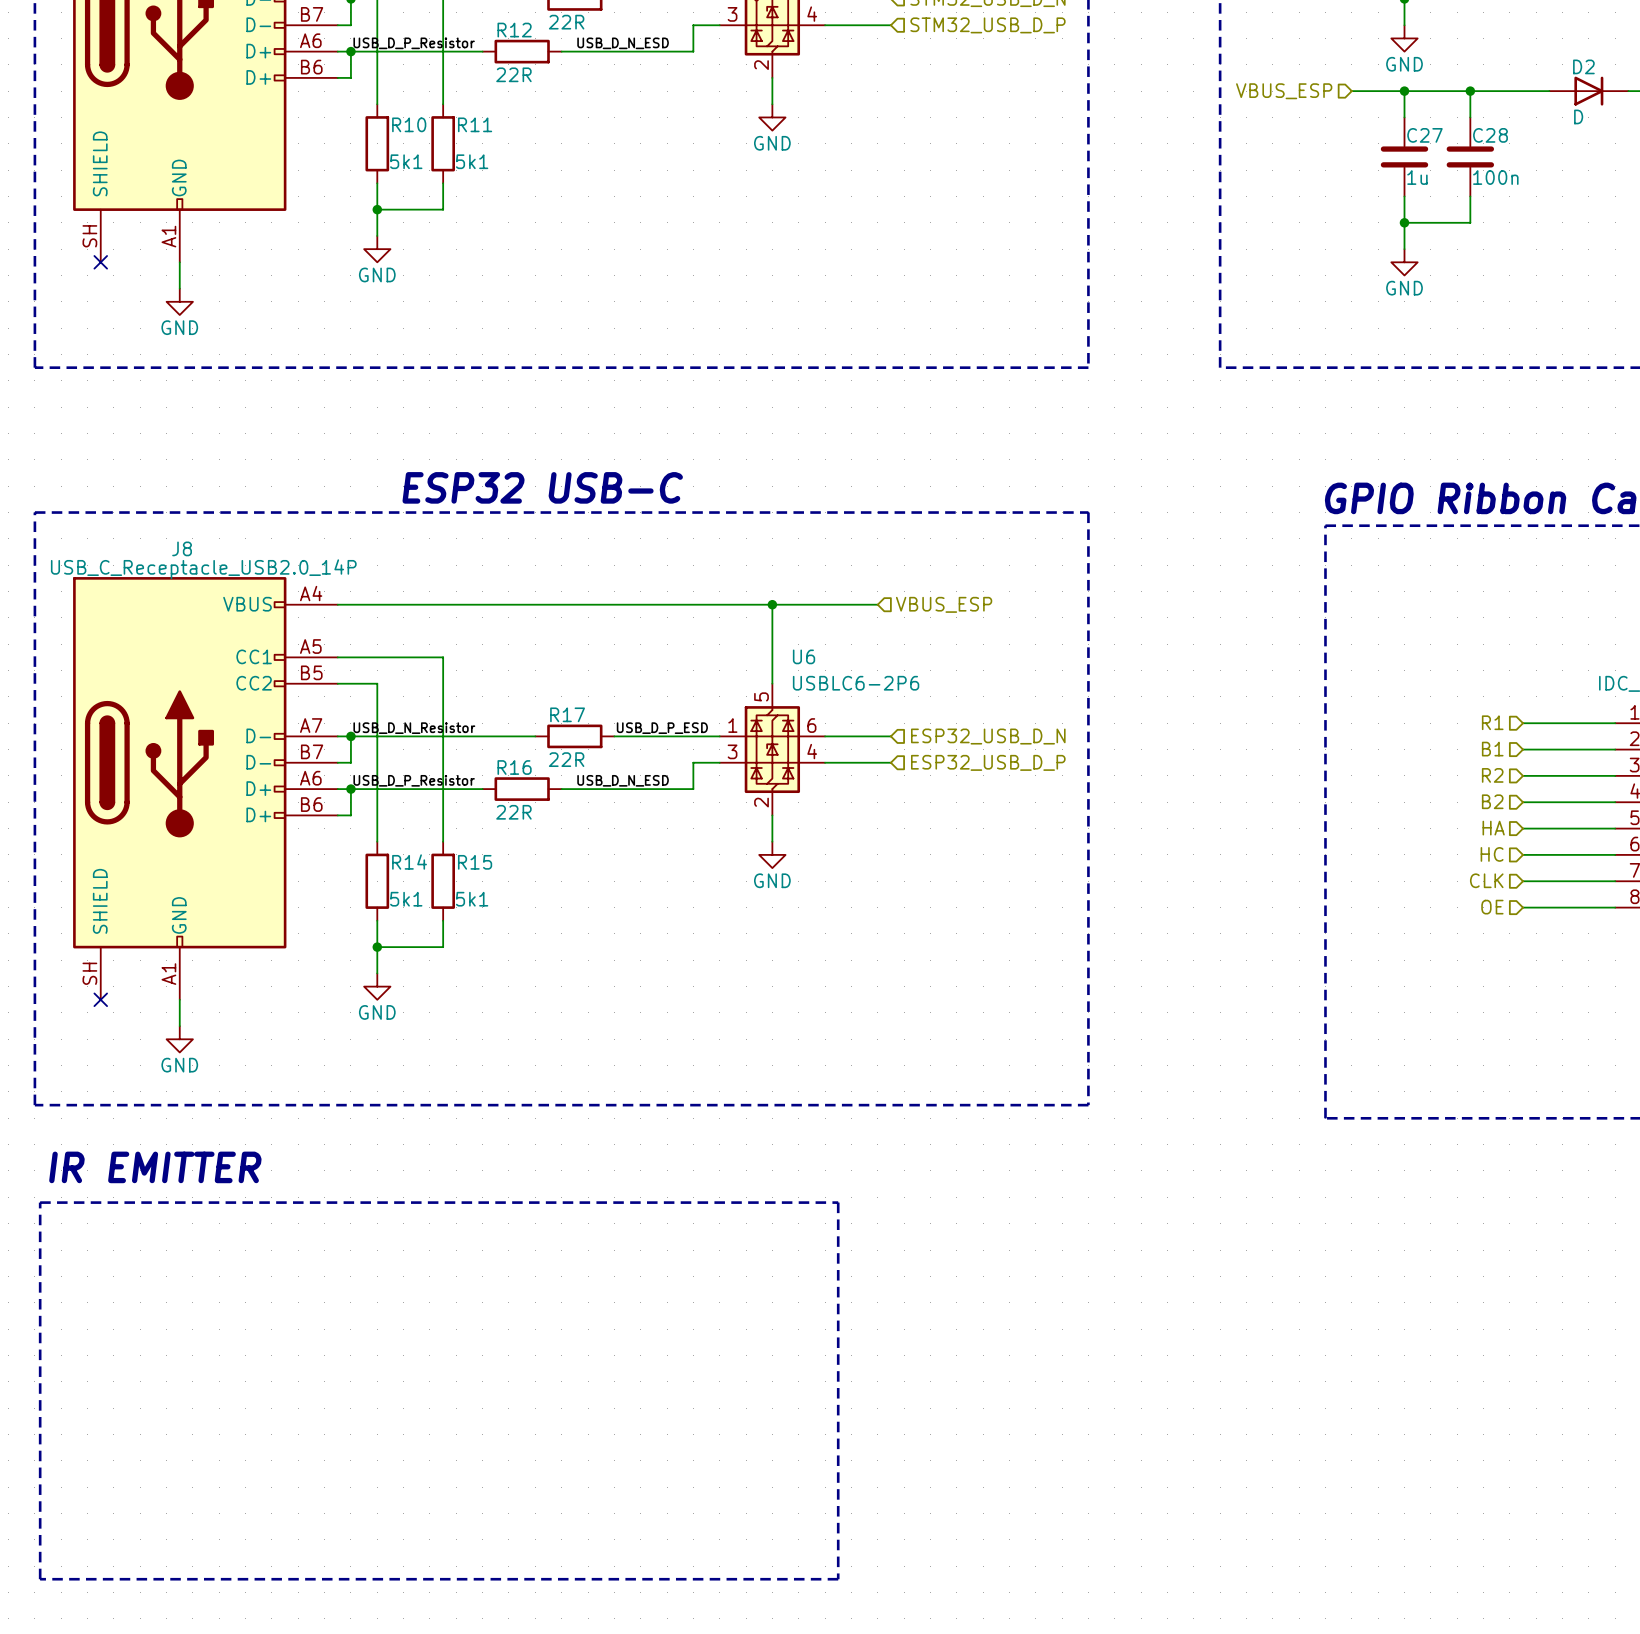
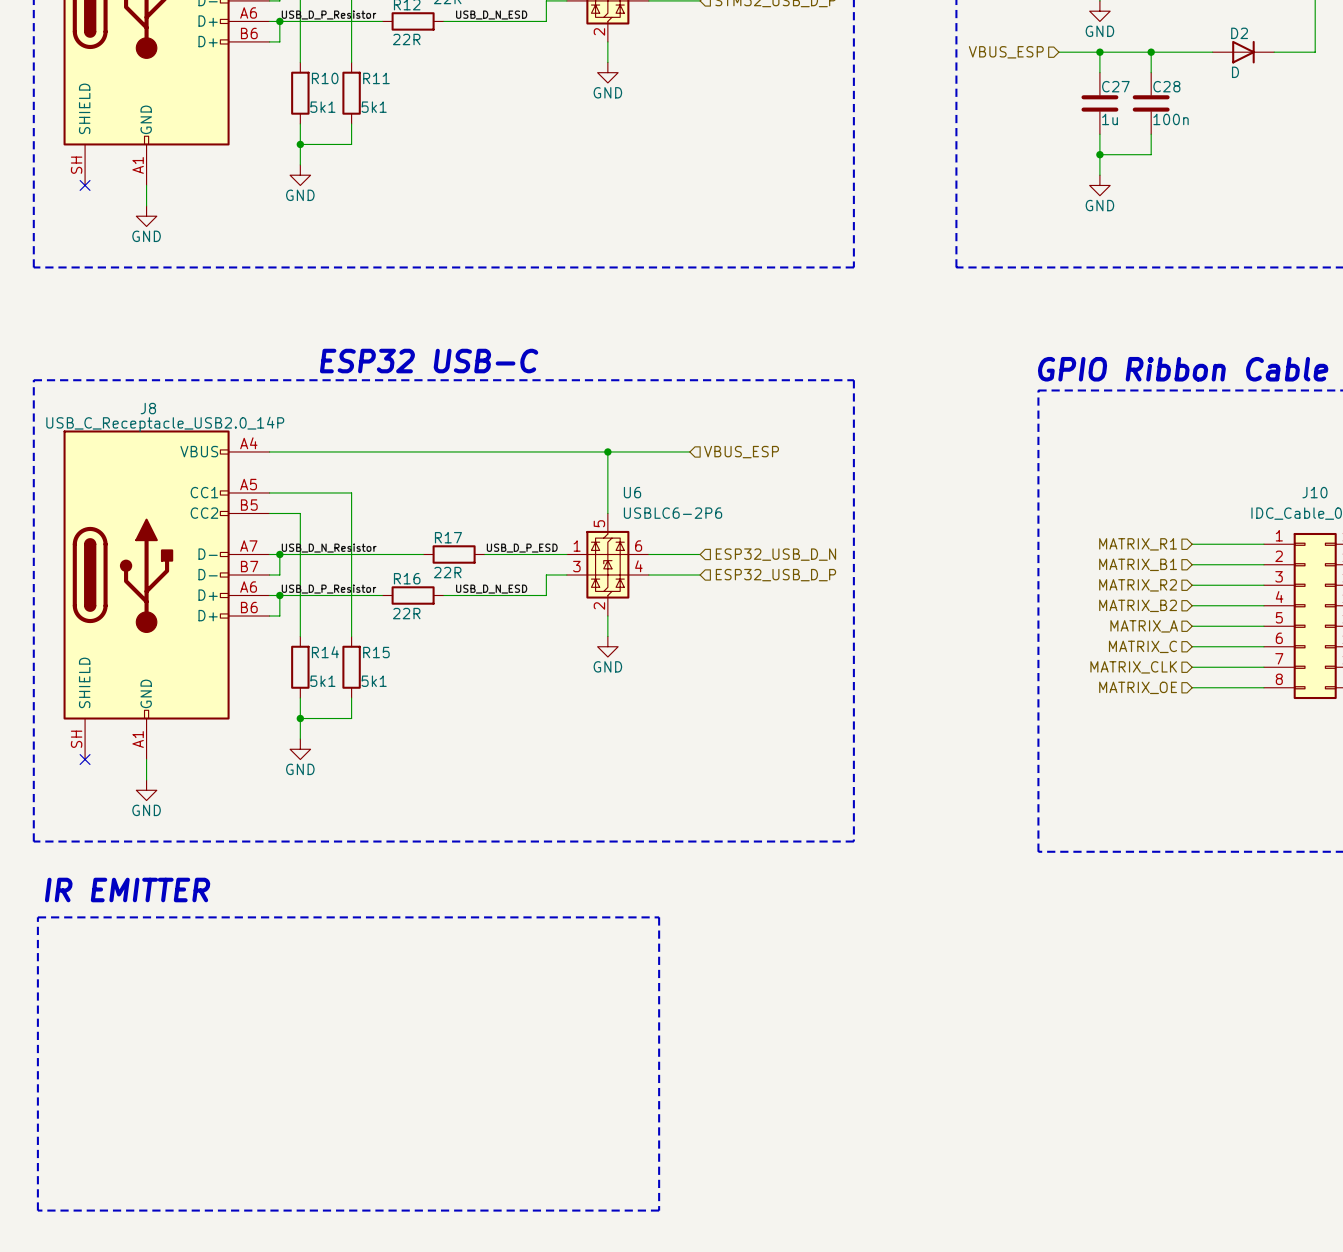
hierarchical label: R1 (1492, 722) -> MATRIX_R1 (1138, 544)
hierarchical label: B1 (1492, 749) -> MATRIX_B1 (1138, 564)
hierarchical label: R2 (1492, 775) -> MATRIX_R2 (1138, 585)
hierarchical label: B2 (1492, 801) -> MATRIX_B2 (1138, 605)
hierarchical label: HA (1493, 828) -> MATRIX_A (1144, 626)
hierarchical label: HC (1492, 854) -> MATRIX_C (1142, 646)
hierarchical label: CLK (1486, 880) -> MATRIX_CLK (1133, 667)
hierarchical label: OE (1492, 907) -> MATRIX_OE (1138, 687)

